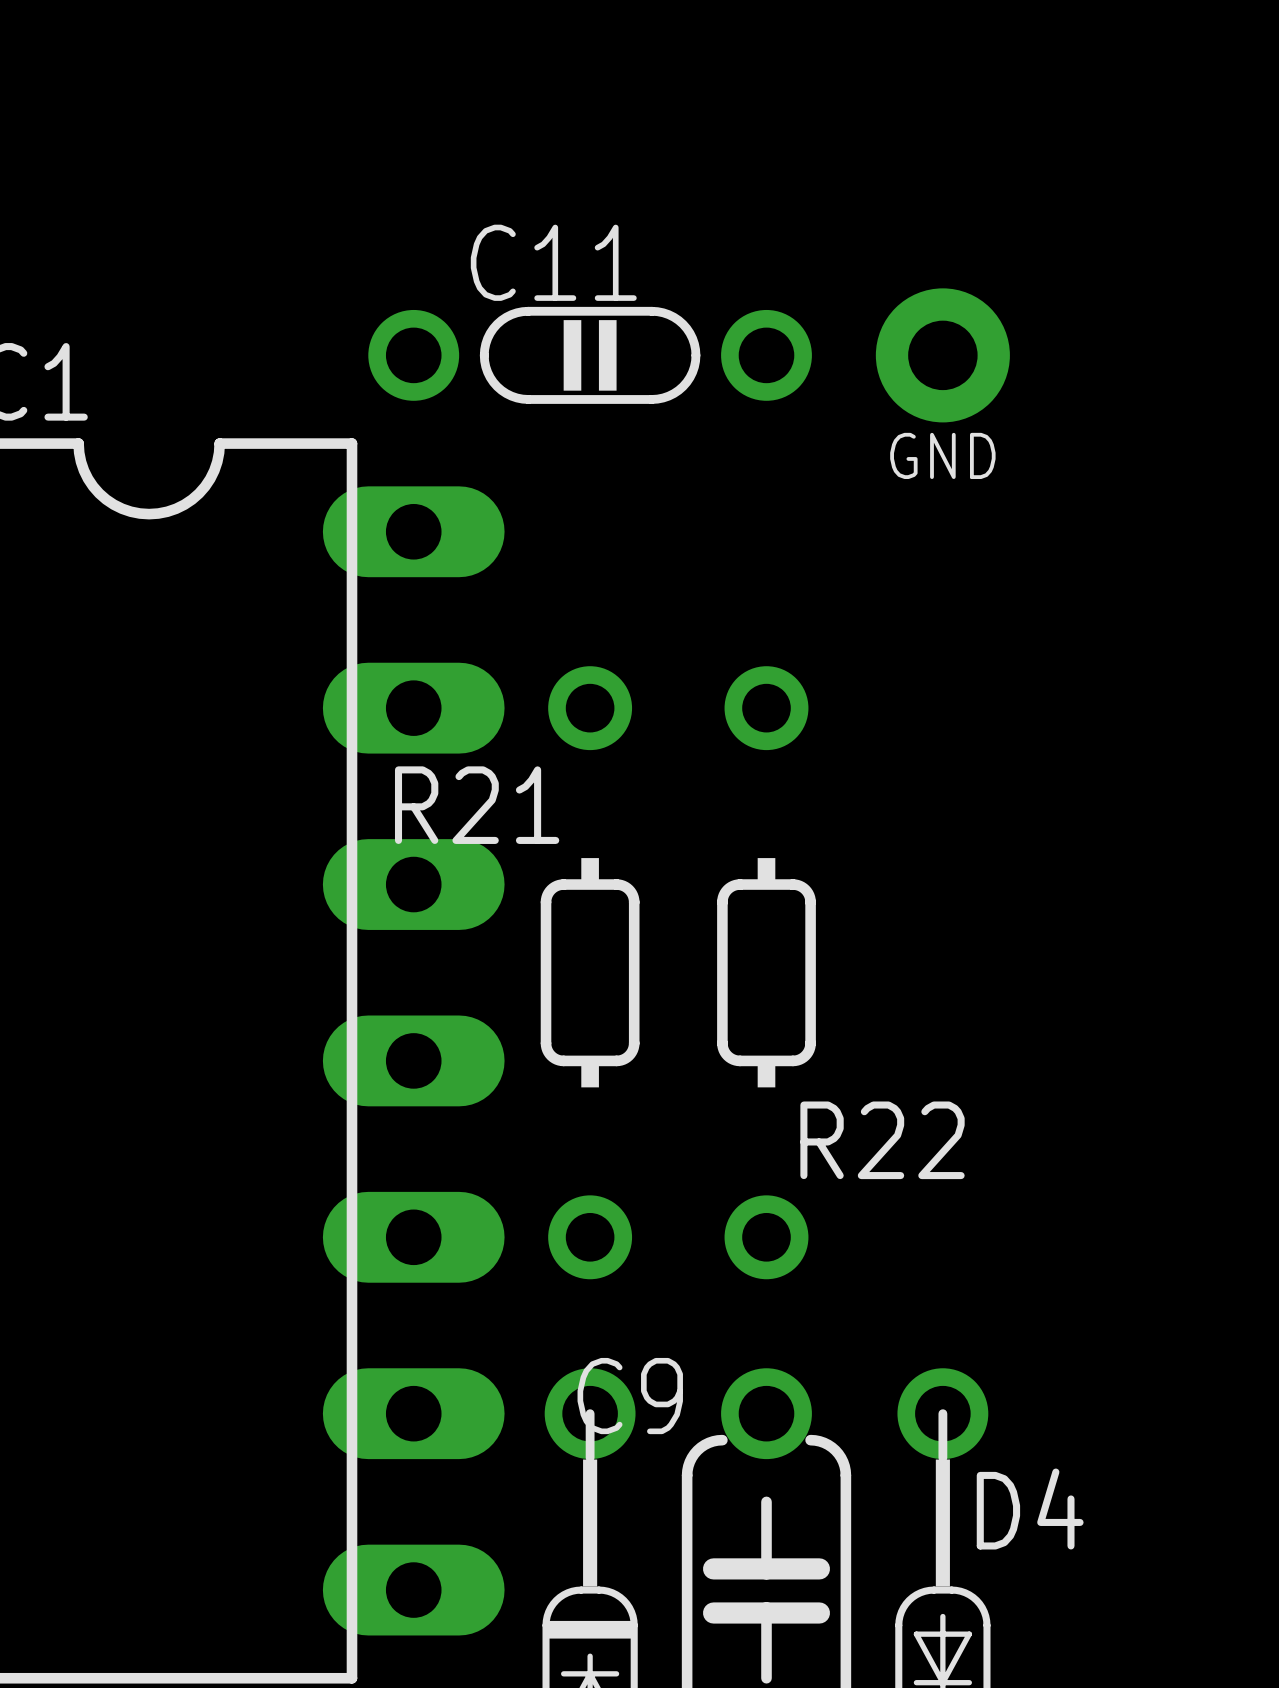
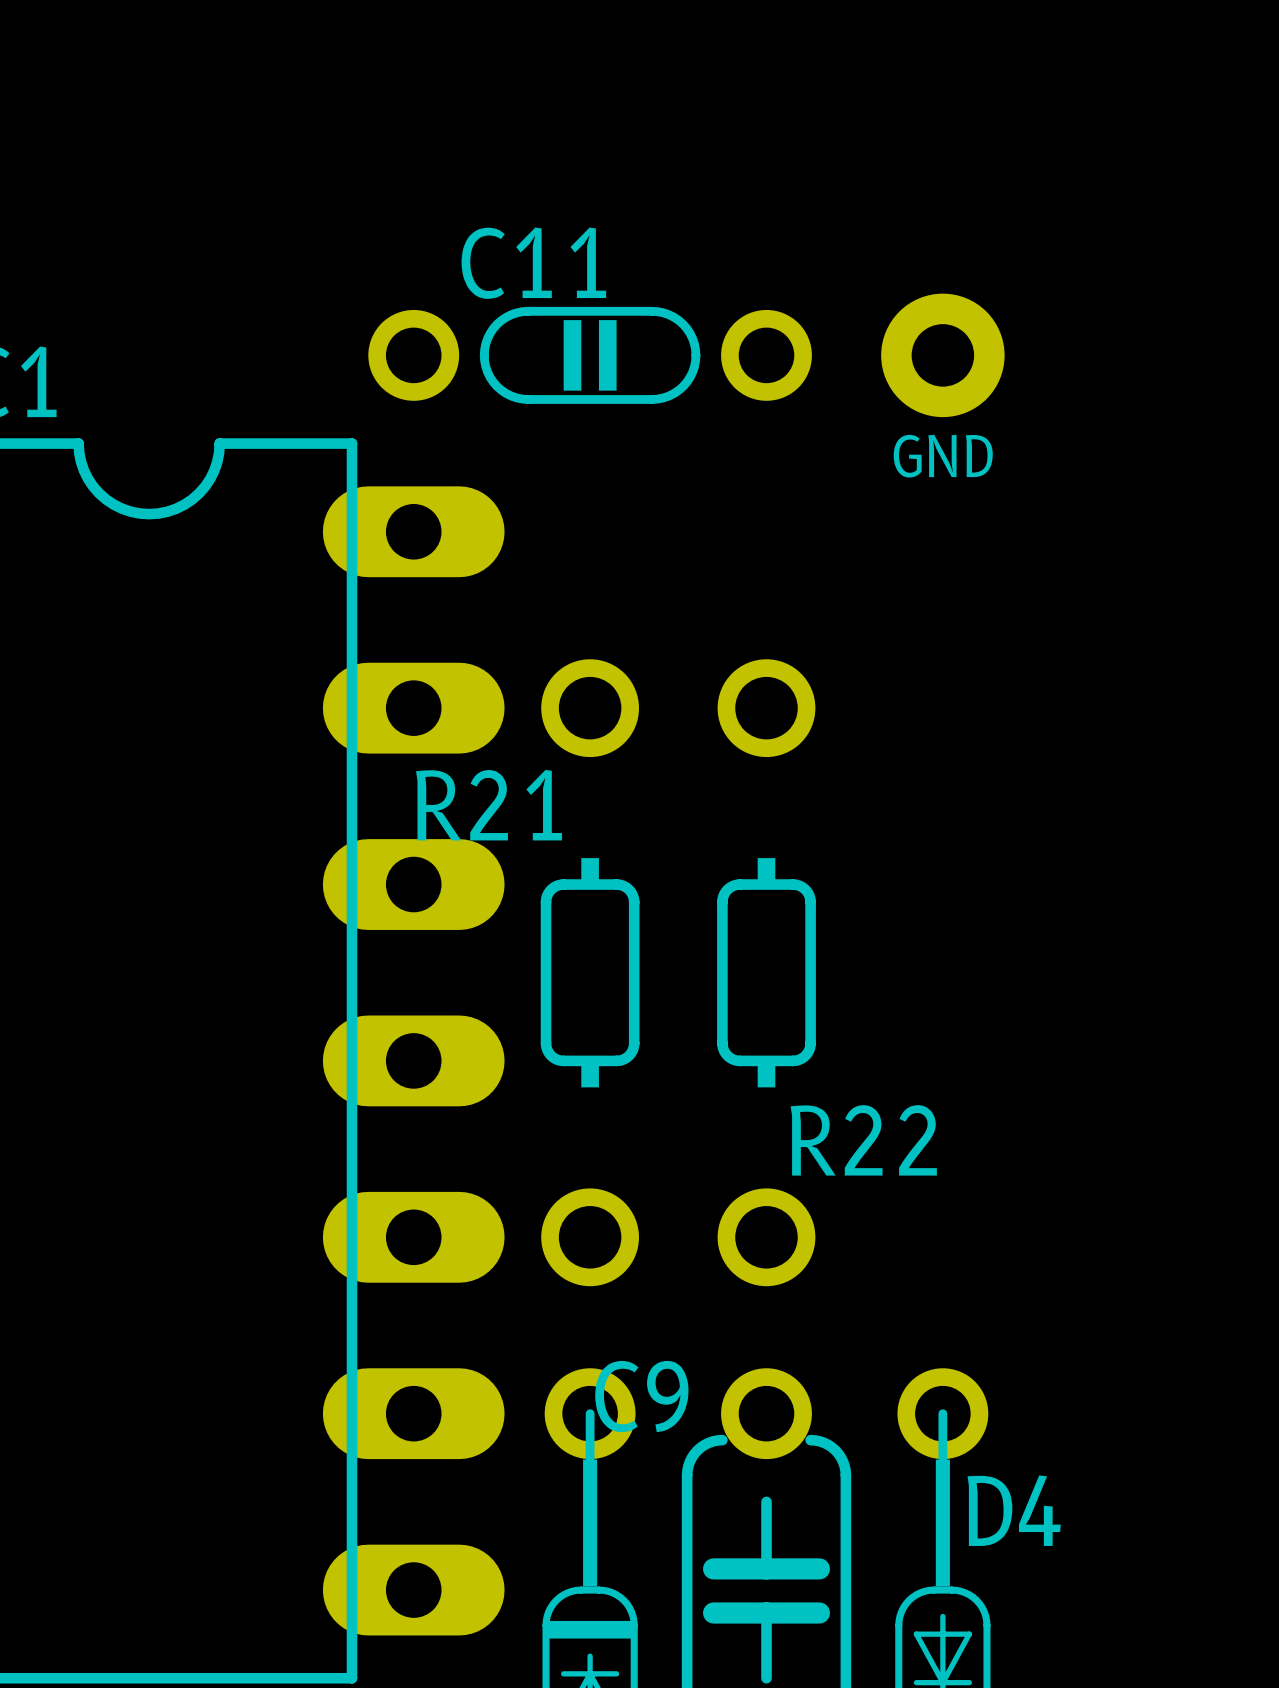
GND footprint: [875, 288, 1010, 423] -> [881, 293, 1005, 418]
R21 footprint: [540, 666, 640, 1280] -> [540, 659, 640, 1287]
R22 footprint: [717, 666, 816, 1280] -> [717, 659, 816, 1287]

